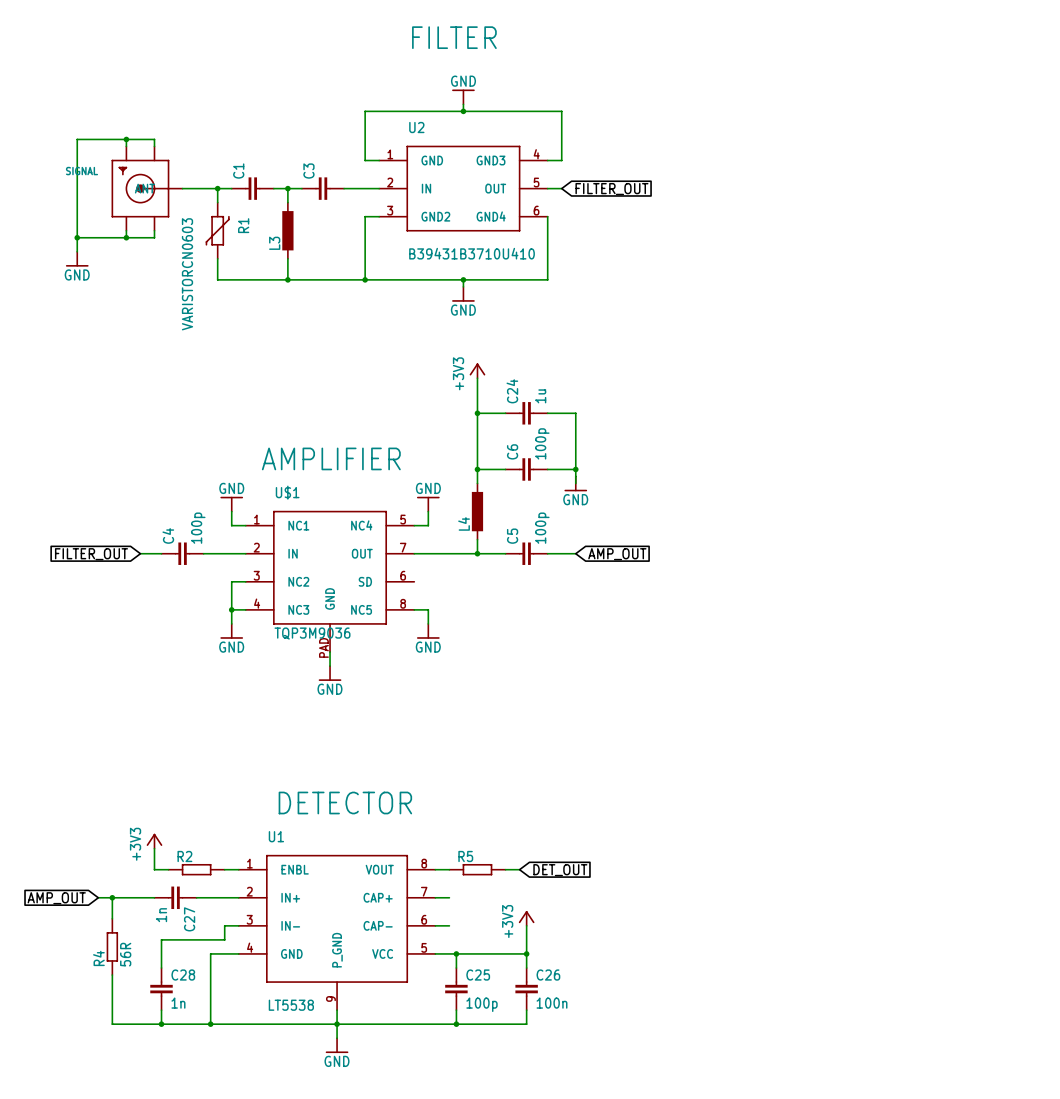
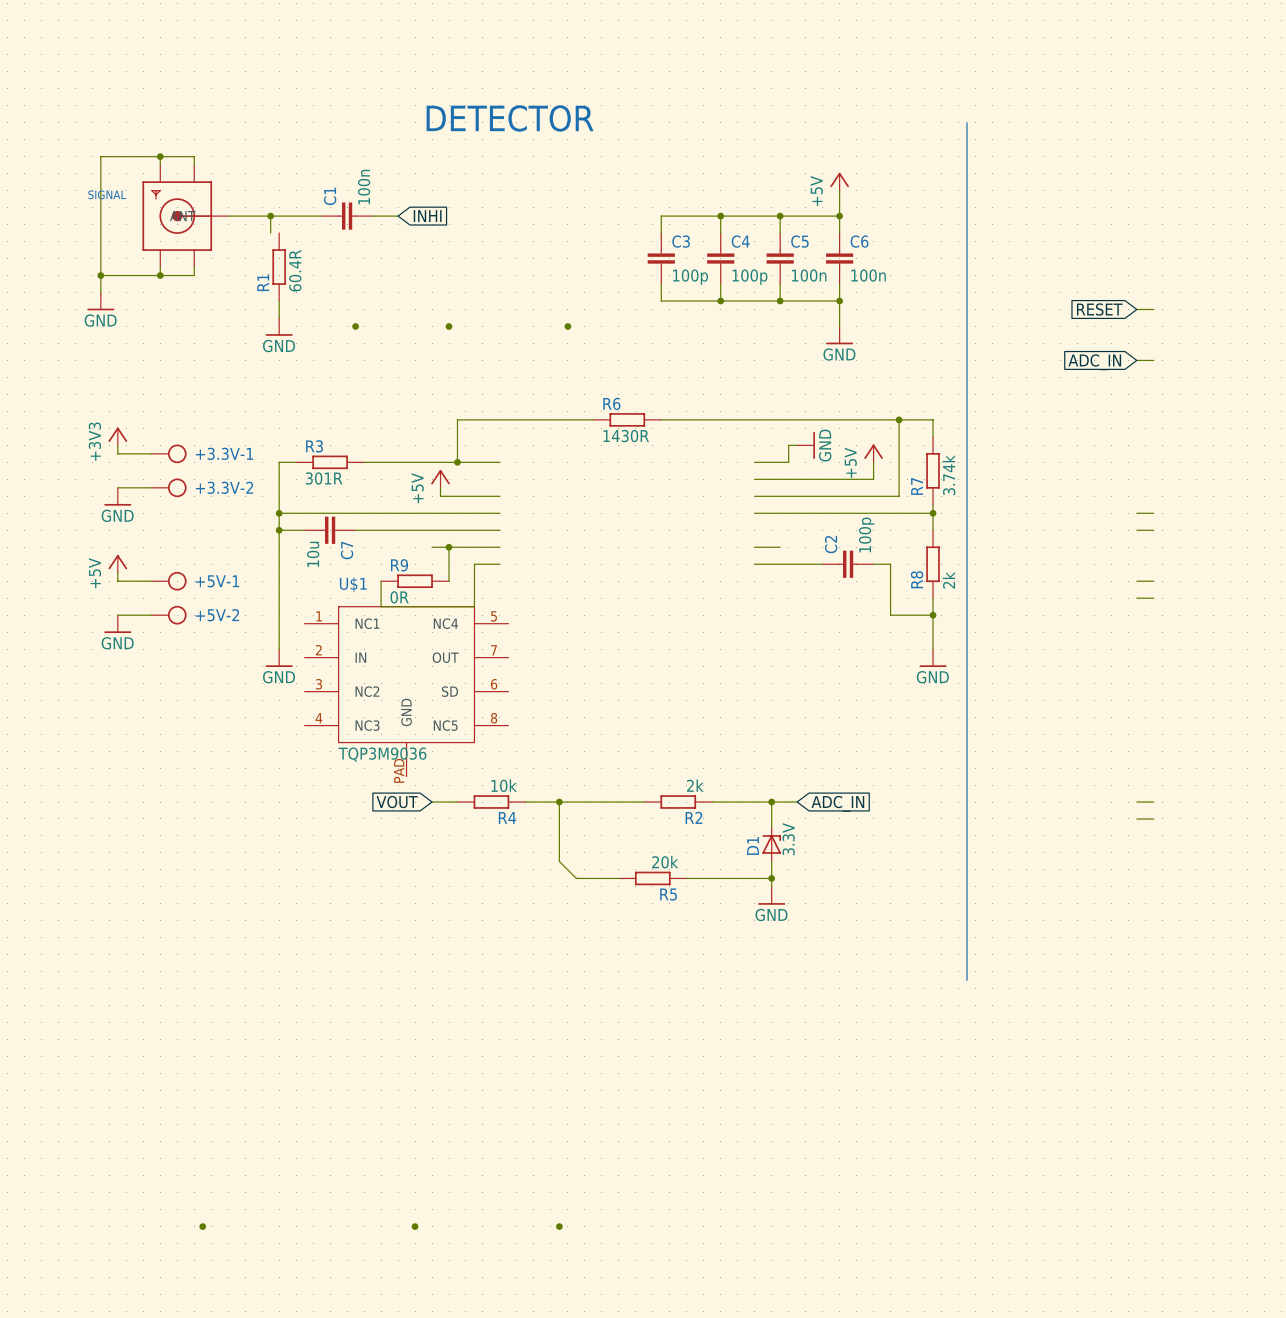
text: FILTER (454, 37) -> none
power symbol: GND (463, 96) -> none
wire: (463, 104) (463, 111) -> none
text: none -> DETECTOR (510, 118)
junction: (463, 111) -> none
line: none -> (966, 122) (966, 980)
wire: (379, 160) (365, 160) (365, 111) (561, 111) (561, 160) (547, 160) -> none
power symbol: none -> +5V (839, 181)
C1 value: none -> 100n (364, 187)
wire: none -> (839, 190) (839, 233)
C1 position: (252, 188) -> (347, 216)
wire: (287, 188) (287, 202) -> (279, 301) (279, 317)
junction: (287, 188) -> none
C3 rotation: 0° (323, 188) -> 90° clockwise (661, 258)
C3 position: (323, 188) -> (661, 258)
wire: (344, 188) (379, 188) -> none
global label: none -> INHI (427, 216)
U2: B39431B3710U410 (463, 188) -> none
wire: none -> (669, 216) (661, 216) (661, 233)
wire: none -> (686, 216) (839, 216)
wire: none -> (720, 216) (720, 233)
junction: none -> (720, 216)
wire: none -> (780, 216) (780, 233)
junction: none -> (780, 216)
junction: none -> (839, 216)
global label: FILTER_OUT (611, 189) -> none
R1 symbol: [205, 202, 230, 259] -> [272, 233, 286, 302]
wire: (379, 216) (365, 216) (365, 279) -> none
wire: (547, 216) (547, 279) (217, 279) (217, 258) -> none
R1 name position: R1 (243, 225) -> R1 (263, 282)
L3: (287, 230) -> none
C3 value: none -> 100p (690, 277)
wire: none -> (661, 284) (661, 301) (839, 301)
wire: none -> (720, 284) (720, 301)
wire: none -> (780, 284) (780, 301)
wire: none -> (839, 284) (839, 326)
wire: (287, 258) (287, 279) -> none
junction: none -> (720, 301)
junction: none -> (780, 301)
junction: none -> (839, 301)
global label: none -> RESET (1099, 309)
wire: none -> (1136, 309) (1153, 309)
R1 value: VARISTORCN0603 (187, 274) -> 60.4R (295, 270)
wire: (463, 279) (463, 286) -> none
power symbol: none -> GND (279, 326)
power symbol: none -> GND (839, 335)
power symbol: GND (463, 294) -> none
wire: none -> (1136, 360) (1153, 360)
global label: none -> ADC_IN (1094, 362)
wire: none -> (593, 419) (457, 419) (457, 462)
R6: none -> 1430R (627, 419)
wire: none -> (661, 419) (933, 419) (933, 436)
wire: none -> (899, 419) (899, 496) (754, 496)
junction: none -> (899, 419)
power symbol: none -> +3V3 (117, 436)
power symbol: +3V3 (477, 370) -> none
wire: none -> (117, 445) (117, 453) (151, 453)
wire: (477, 378) (477, 483) -> none
wire: none -> (797, 445) (788, 445) (788, 462) (754, 462)
power symbol: none -> GND (806, 445)
power symbol: none -> +5V (873, 453)
+3.3V-1: none -> (169, 453)
wire: none -> (296, 462) (279, 462) (279, 649)
R3: none -> 301R (330, 462)
wire: none -> (364, 462) (499, 462)
junction: none -> (457, 462)
wire: none -> (873, 462) (873, 479) (754, 479)
R7: none -> 3.74k (933, 470)
power symbol: none -> +5V (440, 478)
wire: none -> (117, 487) (151, 487)
+3.3V-2: none -> (169, 487)
wire: none -> (440, 487) (440, 496) (499, 496)
wire: (477, 413) (505, 413) -> none
junction: (477, 413) -> none
C24: 1u (526, 413) -> none
wire: (547, 413) (575, 413) (575, 483) -> none
power symbol: none -> GND (117, 496)
wire: none -> (933, 504) (933, 530)
wire: none -> (279, 513) (499, 513)
junction: none -> (279, 513)
wire: none -> (754, 513) (933, 513)
junction: none -> (933, 513)
wire: none -> (1136, 513) (1153, 513)
C6 value: 100p (542, 443) -> 100n (868, 275)
junction: none -> (279, 530)
C7: none -> 10u (330, 530)
wire: none -> (355, 530) (499, 530)
wire: none -> (1136, 530) (1153, 530)
text: AMPLIFIER (331, 458) -> none
wire: none -> (432, 547) (499, 547)
wire: none -> (449, 547) (449, 581)
junction: none -> (449, 547)
wire: none -> (754, 547) (780, 547)
wire: (477, 469) (505, 469) -> none
junction: (477, 469) -> none
C6 rotation: 0° (526, 469) -> 90° clockwise (839, 258)
C6 position: (526, 469) -> (839, 258)
wire: (547, 469) (575, 469) -> none
junction: (575, 469) -> none
power symbol: none -> +5V (117, 563)
wire: none -> (499, 564) (474, 564) (474, 606) (381, 606) (381, 581)
wire: none -> (754, 564) (822, 564)
C2: none -> 100p (848, 564)
wire: none -> (873, 564) (890, 564) (890, 615) (933, 615)
R8: none -> 2k (933, 564)
wire: none -> (117, 572) (117, 581) (151, 581)
power symbol: GND (575, 483) -> none
+5V-1: none -> (169, 581)
R9: none -> 0R (415, 581)
wire: none -> (1136, 581) (1153, 581)
power symbol: GND (231, 504) -> none
power symbol: GND (428, 504) -> none
wire: none -> (933, 598) (933, 649)
wire: none -> (1136, 598) (1153, 598)
wire: (231, 511) (231, 525) (245, 525) -> none
wire: (428, 511) (428, 525) (414, 525) -> none
L4: (477, 511) -> none
wire: none -> (117, 615) (151, 615)
+5V-2: none -> (169, 615)
junction: none -> (933, 615)
power symbol: none -> GND (117, 624)
C5 value: 100p (542, 528) -> 100n (809, 275)
wire: (477, 539) (477, 553) -> none
wire: (140, 553) (161, 553) -> (279, 530) (304, 530)
C4 rotation: 0° (182, 553) -> 90° clockwise (720, 258)
C4 position: (182, 553) -> (720, 258)
wire: (203, 553) (245, 553) -> none
wire: (414, 553) (505, 553) -> none
junction: (477, 553) -> none
C5 rotation: 0° (526, 553) -> 90° clockwise (780, 258)
C5 position: (526, 553) -> (780, 258)
wire: (547, 553) (575, 553) -> none
global label: FILTER_OUT (91, 554) -> none
power symbol: none -> GND (279, 658)
global label: AMP_OUT (617, 554) -> none
power symbol: none -> GND (933, 658)
wire: (245, 581) (231, 581) (231, 623) -> none
wire: (231, 609) (245, 609) -> none
junction: (231, 609) -> none
wire: (414, 609) (428, 609) (428, 623) -> none
power symbol: GND (231, 631) -> none
power symbol: GND (428, 631) -> none
wire: (330, 652) (330, 666) -> none
R2 value: none -> 2k (695, 785)
global label: none -> VOUT (397, 802)
power symbol: GND (330, 673) -> none
wire: none -> (432, 802) (457, 802)
wire: none -> (525, 802) (644, 802)
wire: none -> (559, 802) (559, 861) (576, 878) (618, 878)
junction: none -> (559, 802)
wire: none -> (712, 802) (797, 802)
wire: none -> (771, 802) (771, 827)
junction: none -> (771, 802)
global label: none -> ADC_IN (837, 803)
wire: none -> (1136, 802) (1153, 802)
wire: none -> (1136, 818) (1153, 818)
D1: none -> 3.3V (771, 844)
R5 value: none -> 20k (665, 862)
wire: none -> (771, 861) (771, 886)
wire: none -> (686, 878) (771, 878)
junction: none -> (771, 878)
power symbol: none -> GND (771, 895)
text: DETECTOR (345, 802) -> none
power symbol: +3V3 (154, 841) -> none
wire: (154, 848) (154, 869) (168, 869) -> none
R2 name position: R2 (184, 856) -> R2 (693, 817)
R5 name position: R5 (465, 856) -> R5 (668, 894)
R2 position: (196, 869) -> (678, 802)
wire: (224, 869) (238, 869) -> none
wire: (435, 869) (449, 869) -> none
R5 position: (477, 869) -> (652, 878)
wire: (505, 869) (519, 869) -> none
global label: DET_OUT (560, 870) -> none
wire: (98, 897) (154, 897) -> none
wire: (112, 897) (112, 918) -> none
junction: (112, 897) -> none
C27: 1n (175, 897) -> none
wire: (196, 897) (238, 897) -> none
wire: (435, 897) (449, 897) -> none
global label: AMP_OUT (56, 898) -> none
power symbol: +3V3 (526, 918) -> none
wire: (238, 925) (224, 925) (224, 939) (161, 939) (161, 968) -> none
wire: (435, 925) (449, 925) -> none
wire: (526, 925) (526, 968) -> none
U1: LT5538 (337, 932) -> none
R4 rotation: 0° (112, 946) -> 90° clockwise (491, 802)
R4 position: (112, 946) -> (491, 802)
wire: (238, 953) (210, 953) (210, 1024) -> none
wire: (435, 953) (526, 953) -> none
wire: (456, 953) (456, 968) -> none
junction: (456, 953) -> none
junction: (526, 953) -> none
R4 value: 56R (125, 954) -> 10k (504, 785)
R4 name position: R4 (98, 958) -> R4 (507, 817)
wire: (112, 975) (112, 1024) (526, 1024) (526, 1010) -> none
C28: 1n (161, 989) -> none
C25: 100p (456, 989) -> none
C26: 100n (526, 989) -> none
wire: (161, 1010) (161, 1024) -> none
wire: (337, 1010) (337, 1038) -> none
wire: (456, 1010) (456, 1024) -> none
junction: (210, 1024) -> none
power symbol: GND (337, 1045) -> none

